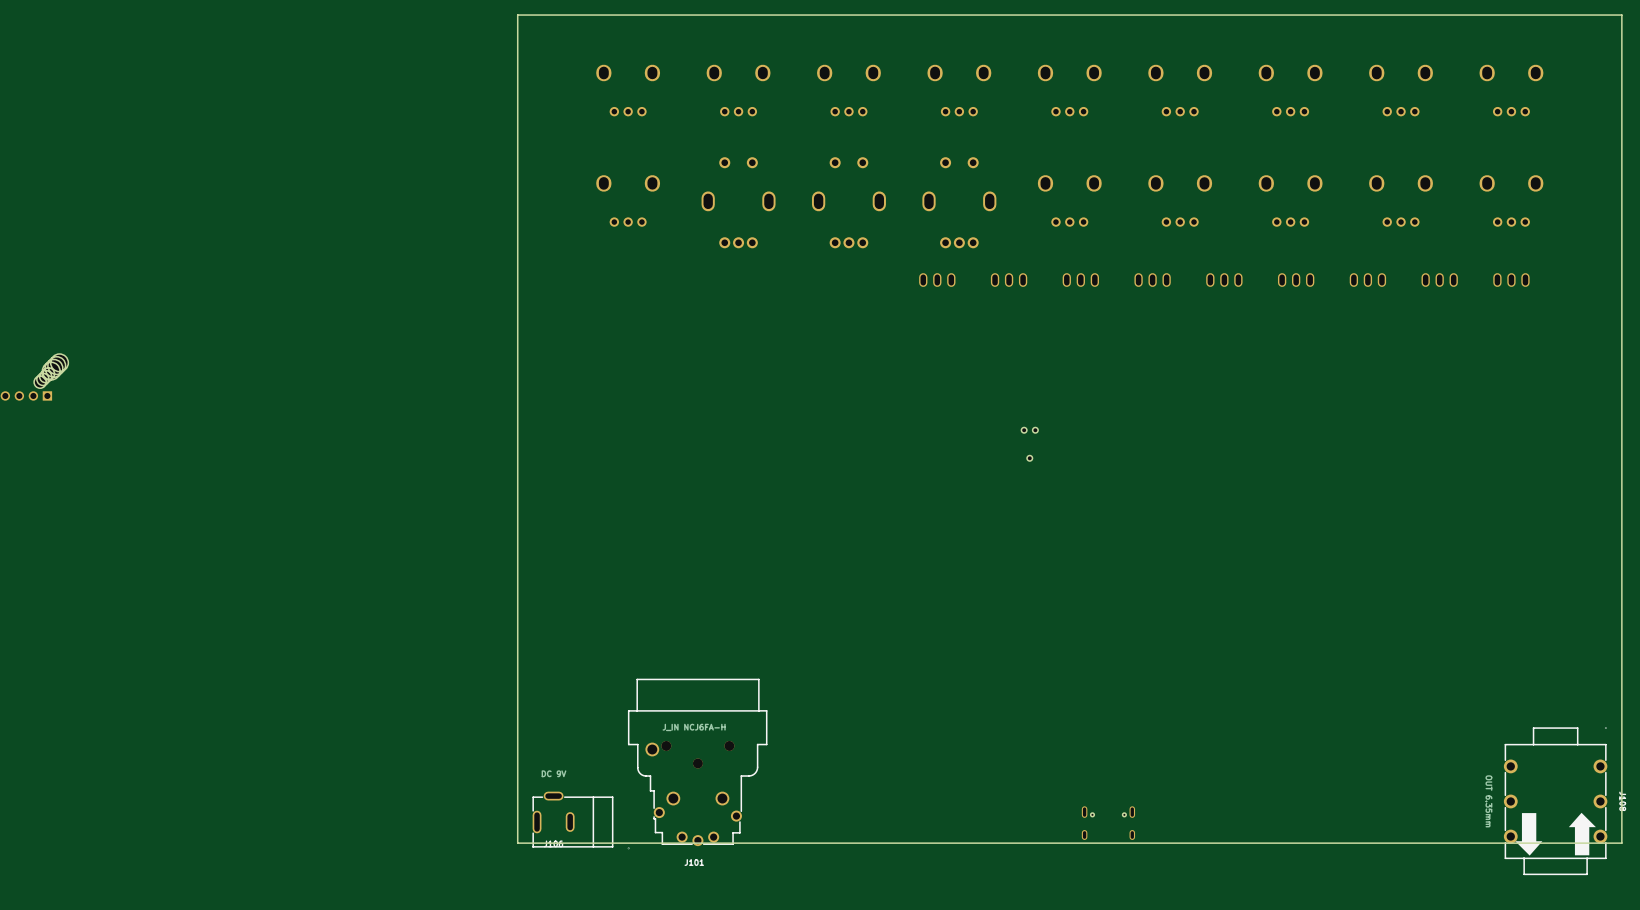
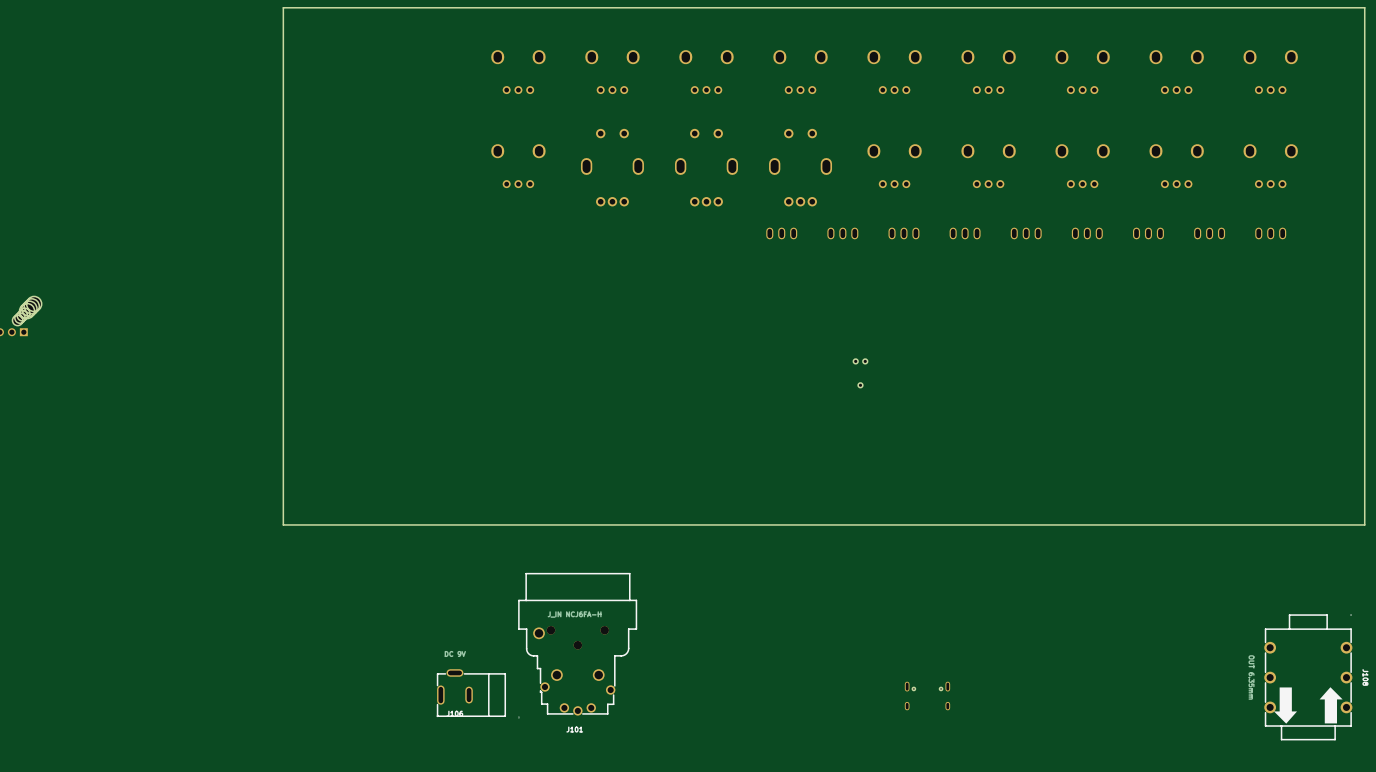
board edge: (517, 15) (517, 843) (1621, 843) (1621, 622) -> (424, 7) (283, 7) (283, 524) (1364, 524)

